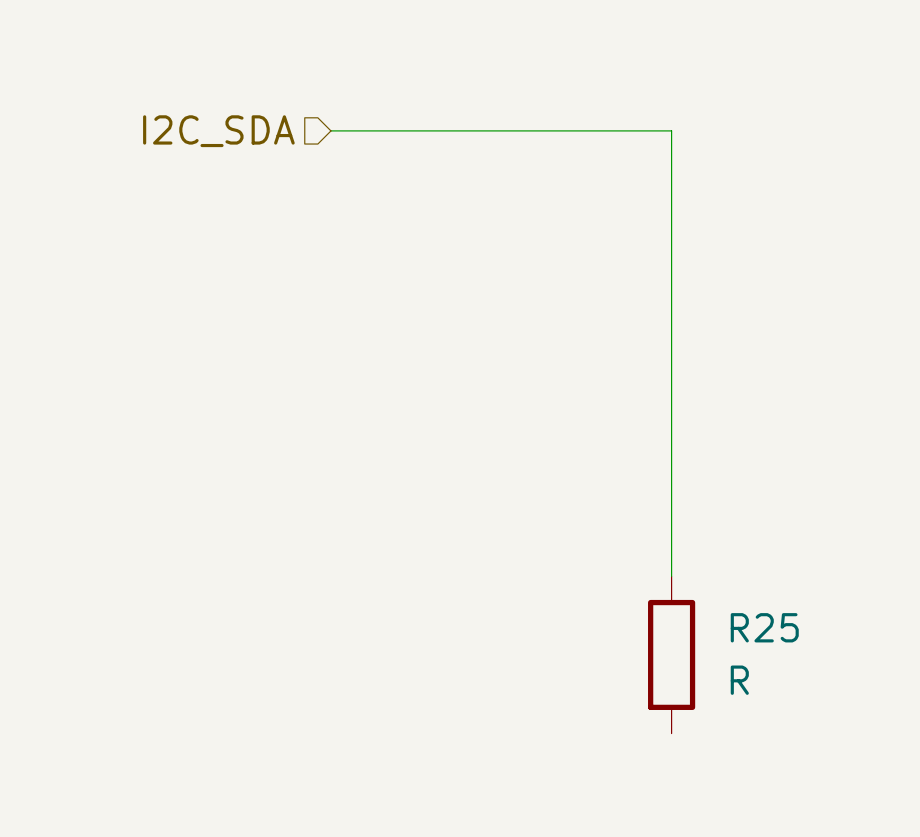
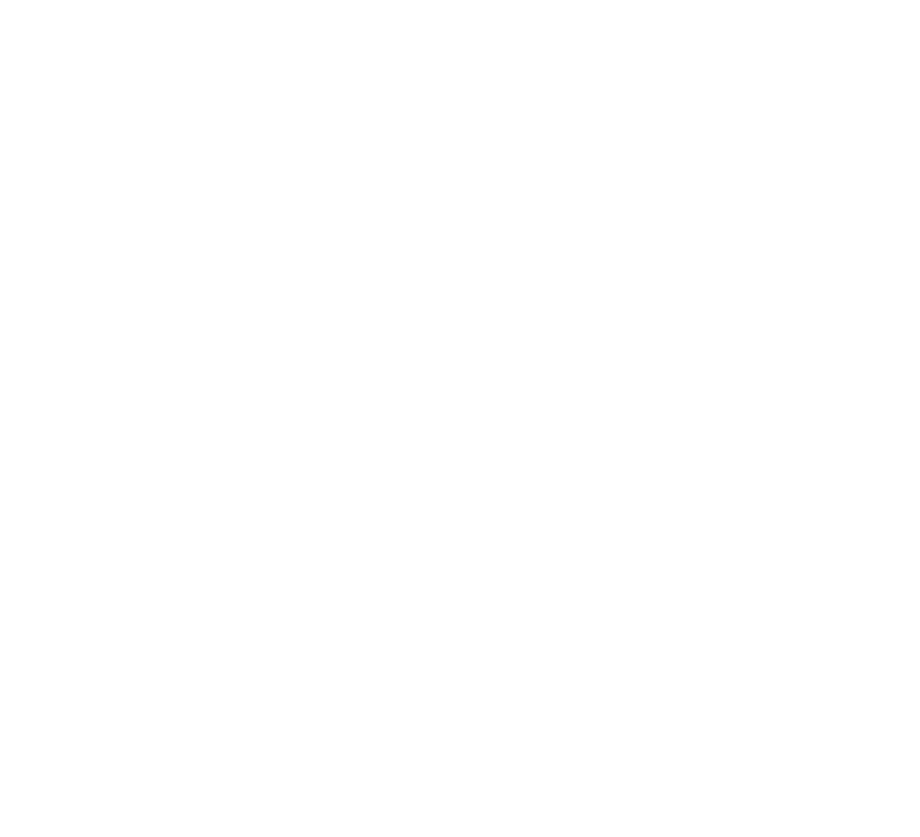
wire: (330, 130) (671, 130) (671, 576) -> none
hierarchical label: I2C_SDA (218, 131) -> none
R25: R (671, 654) -> none

